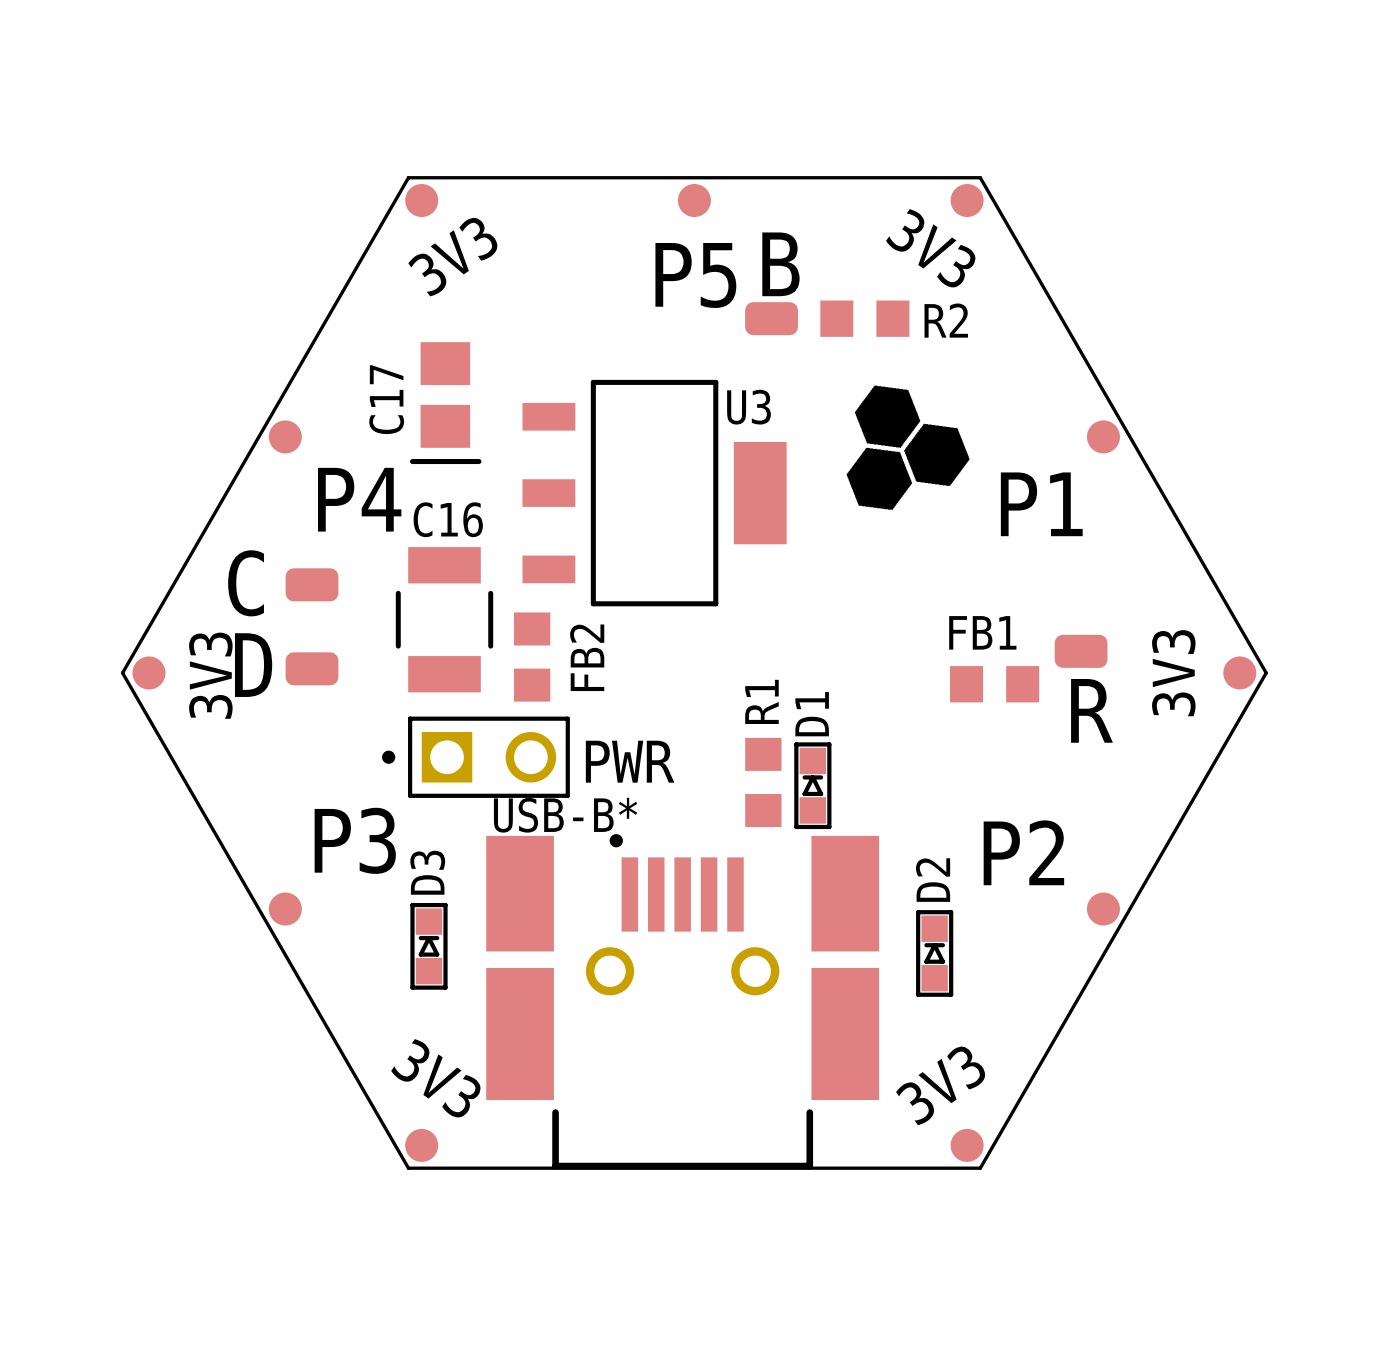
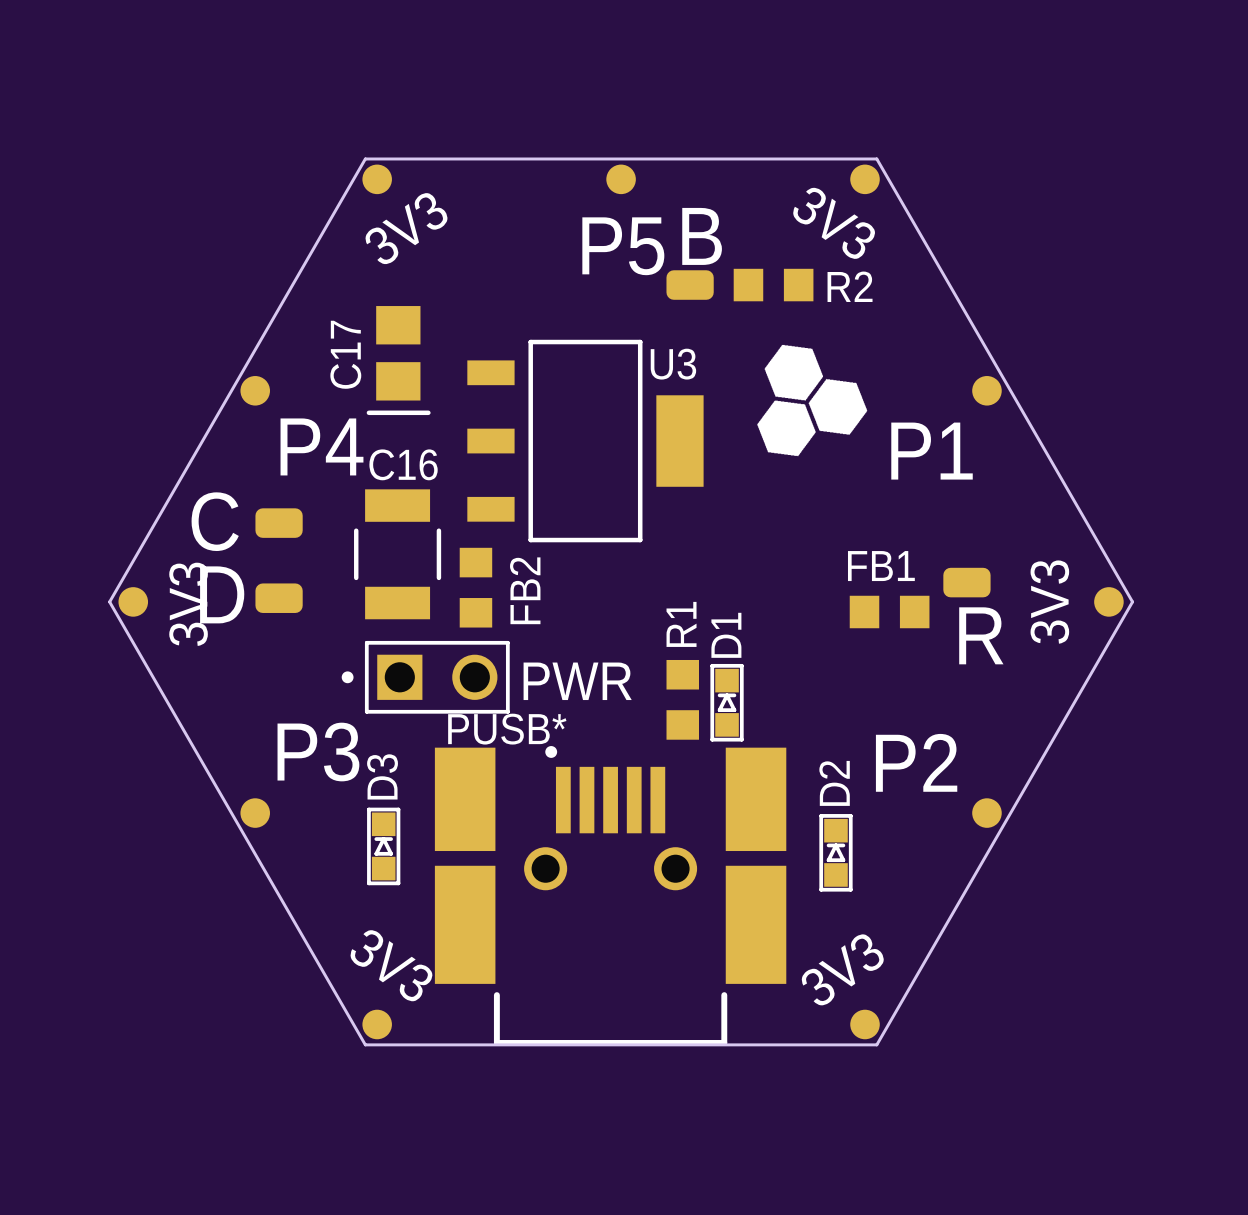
USB-B* name: USB-B* (565, 815) -> PUSB* (507, 729)

